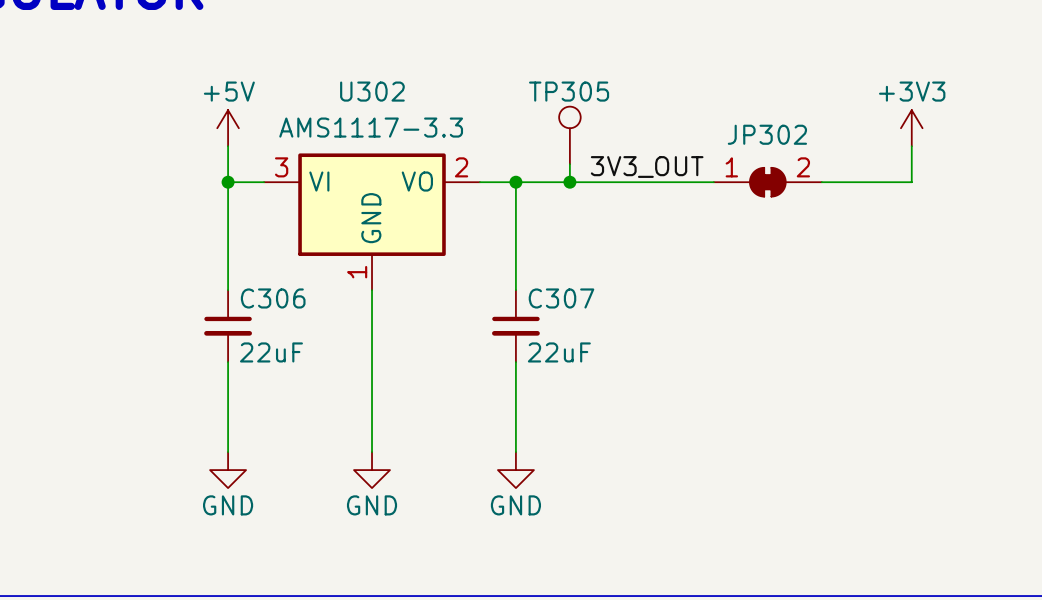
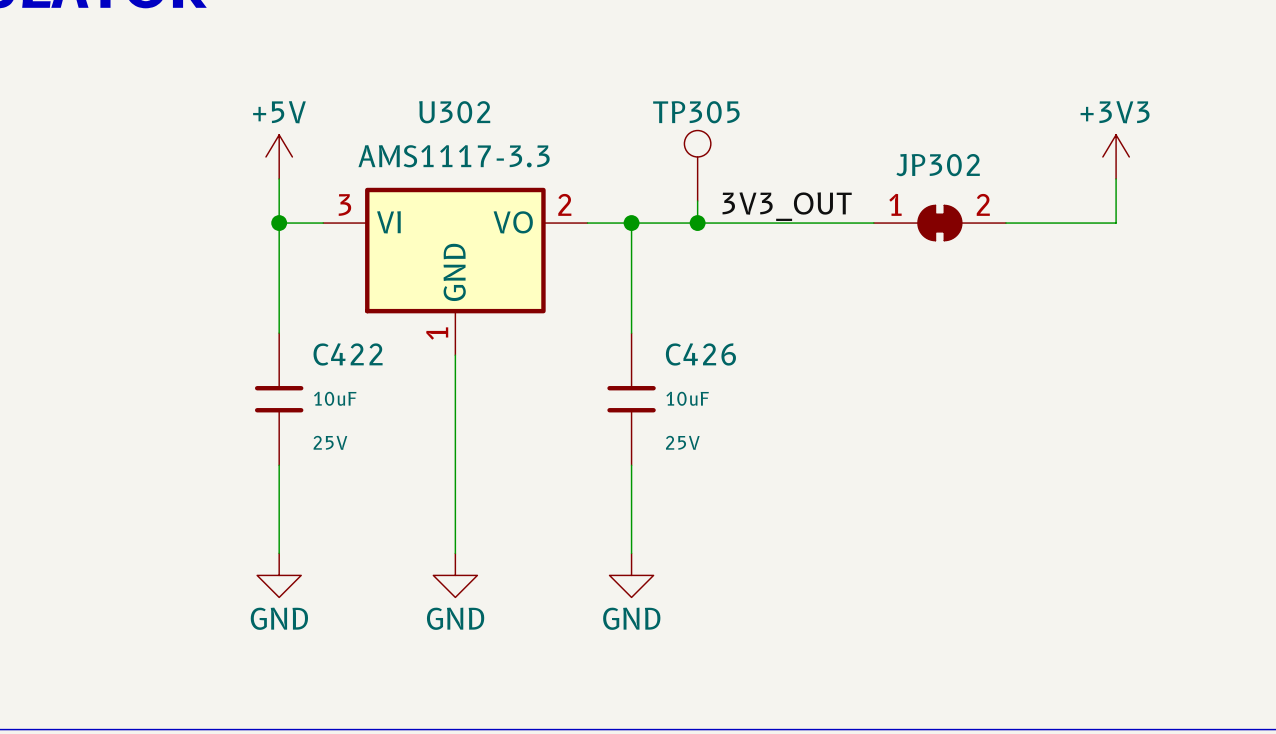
C306: 22uF (228, 326) -> none
C422: none -> 10uF (279, 399)
C307: 22uF (515, 326) -> none
C426: none -> 10uF (631, 399)

